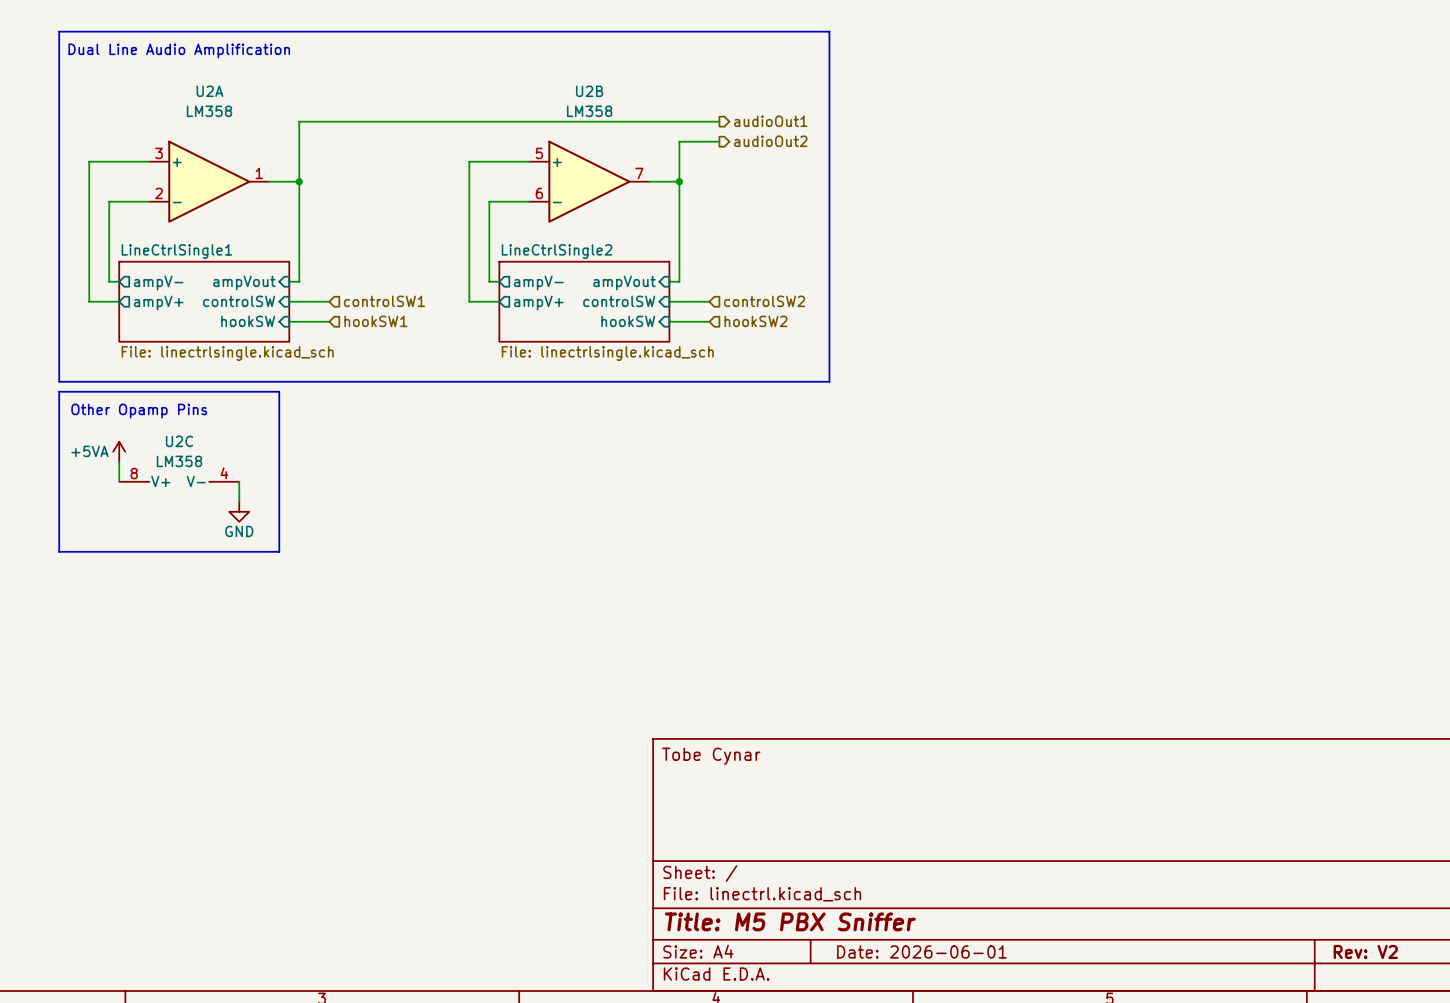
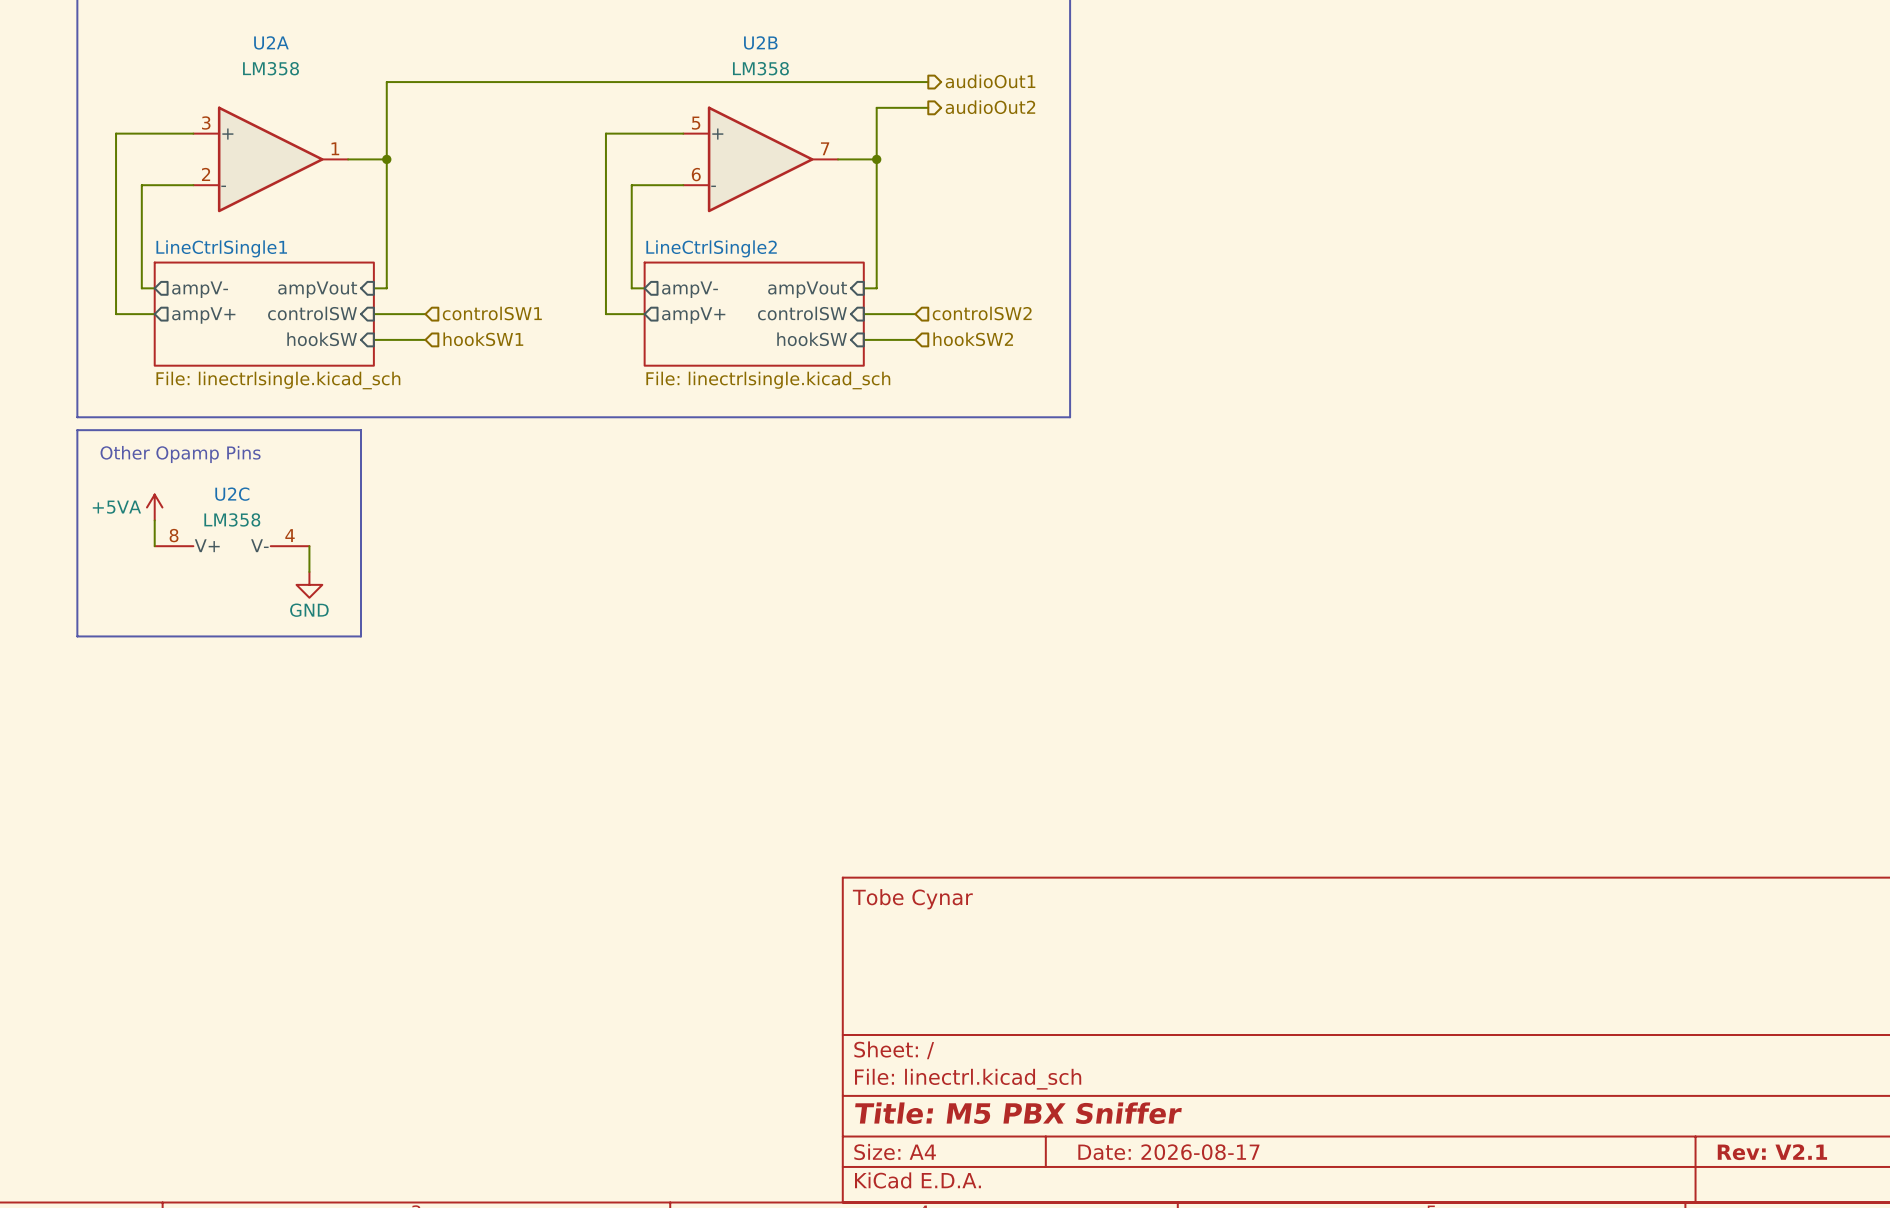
title block: Date: 2026-06-01 (921, 951) -> Date: 2026-08-17 (1168, 1152)
title block: Rev: V2 (1365, 951) -> Rev: V2.1 (1772, 1152)

